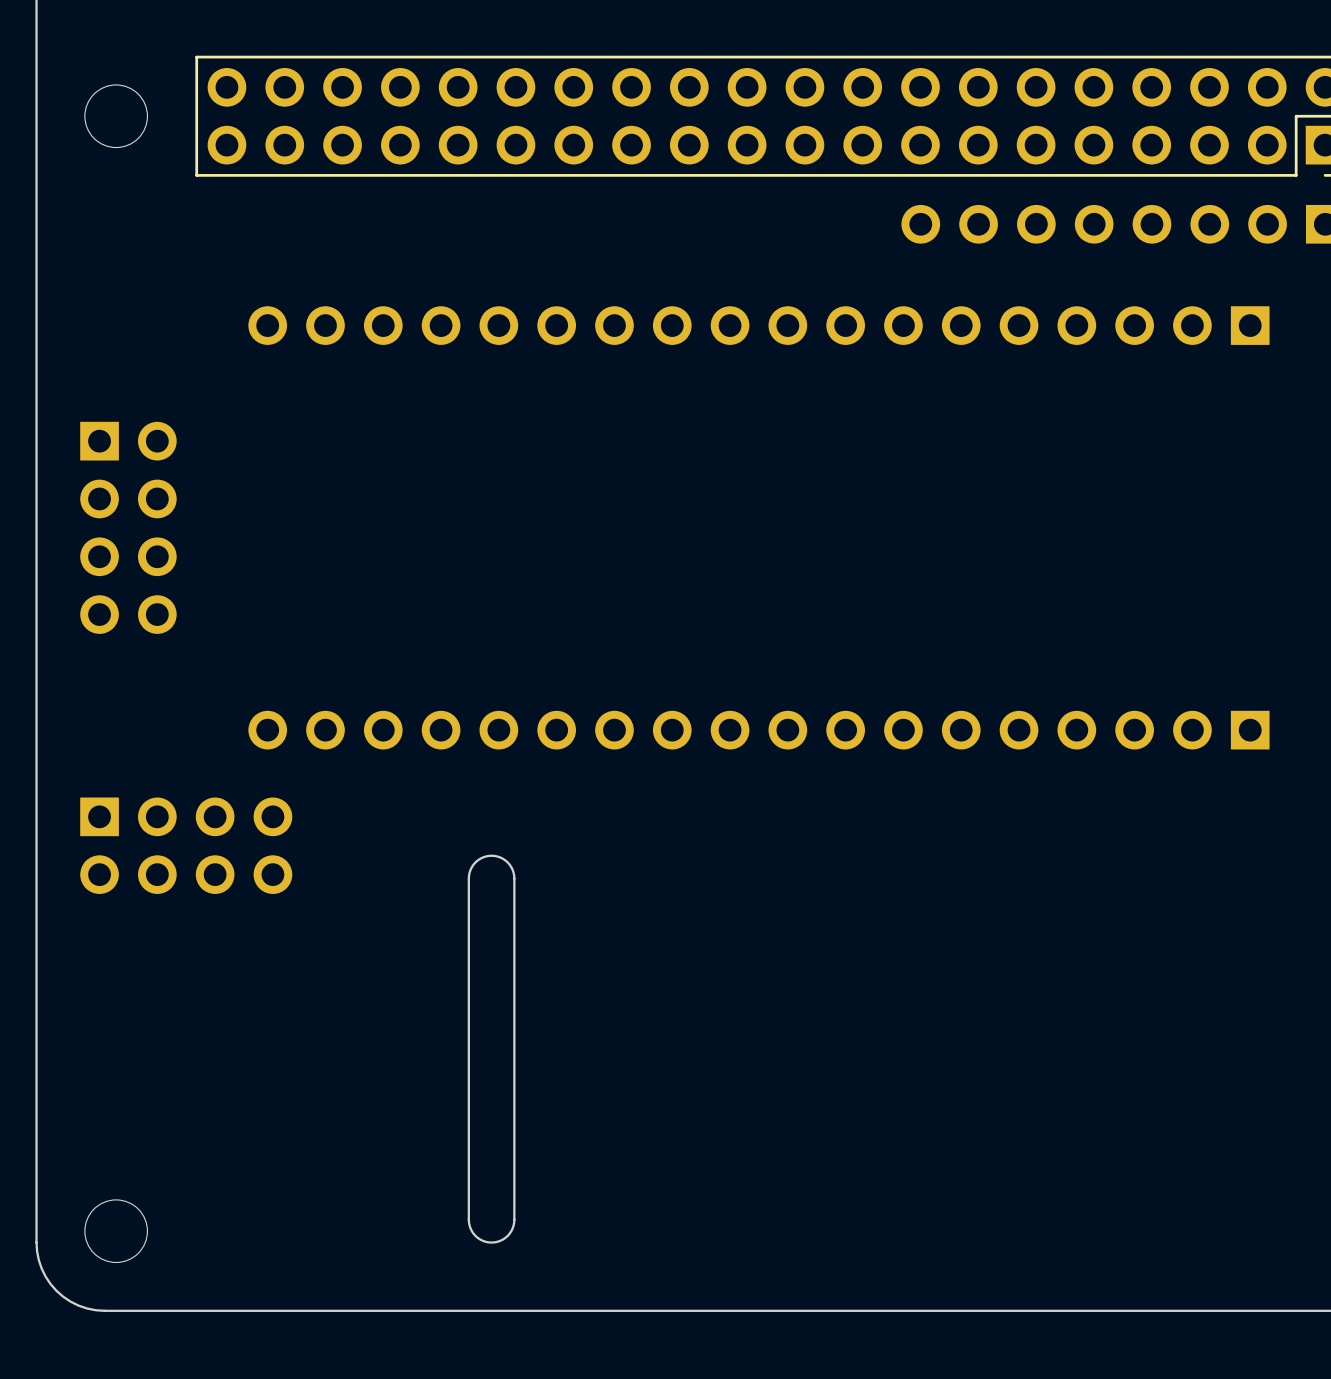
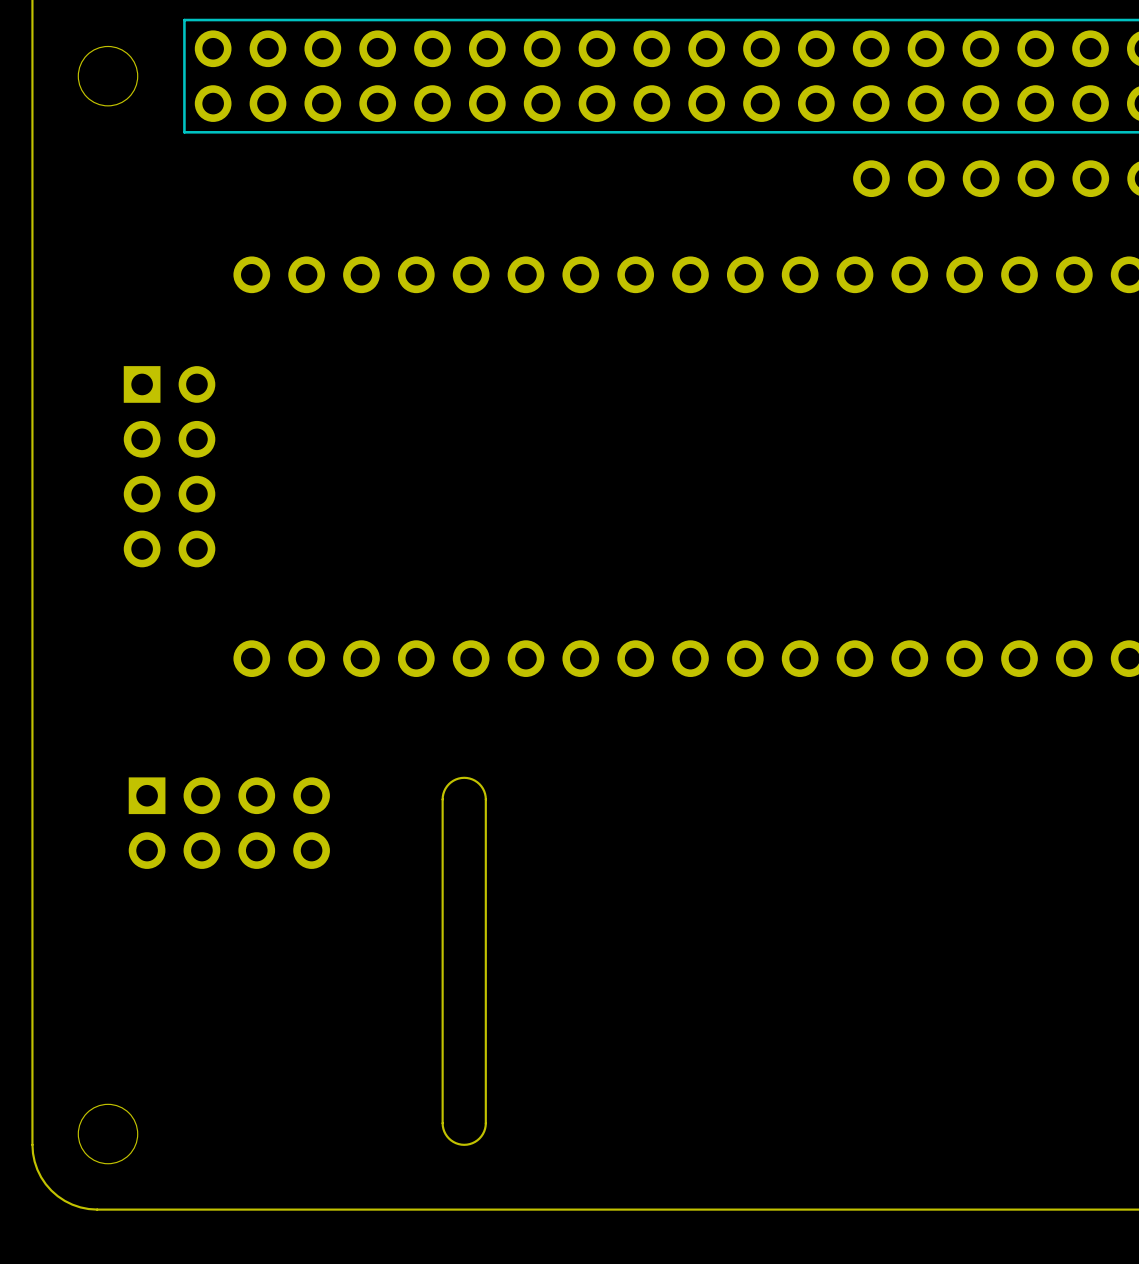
part position: (128, 527) -> (169, 466)
part position: (186, 845) -> (229, 823)

